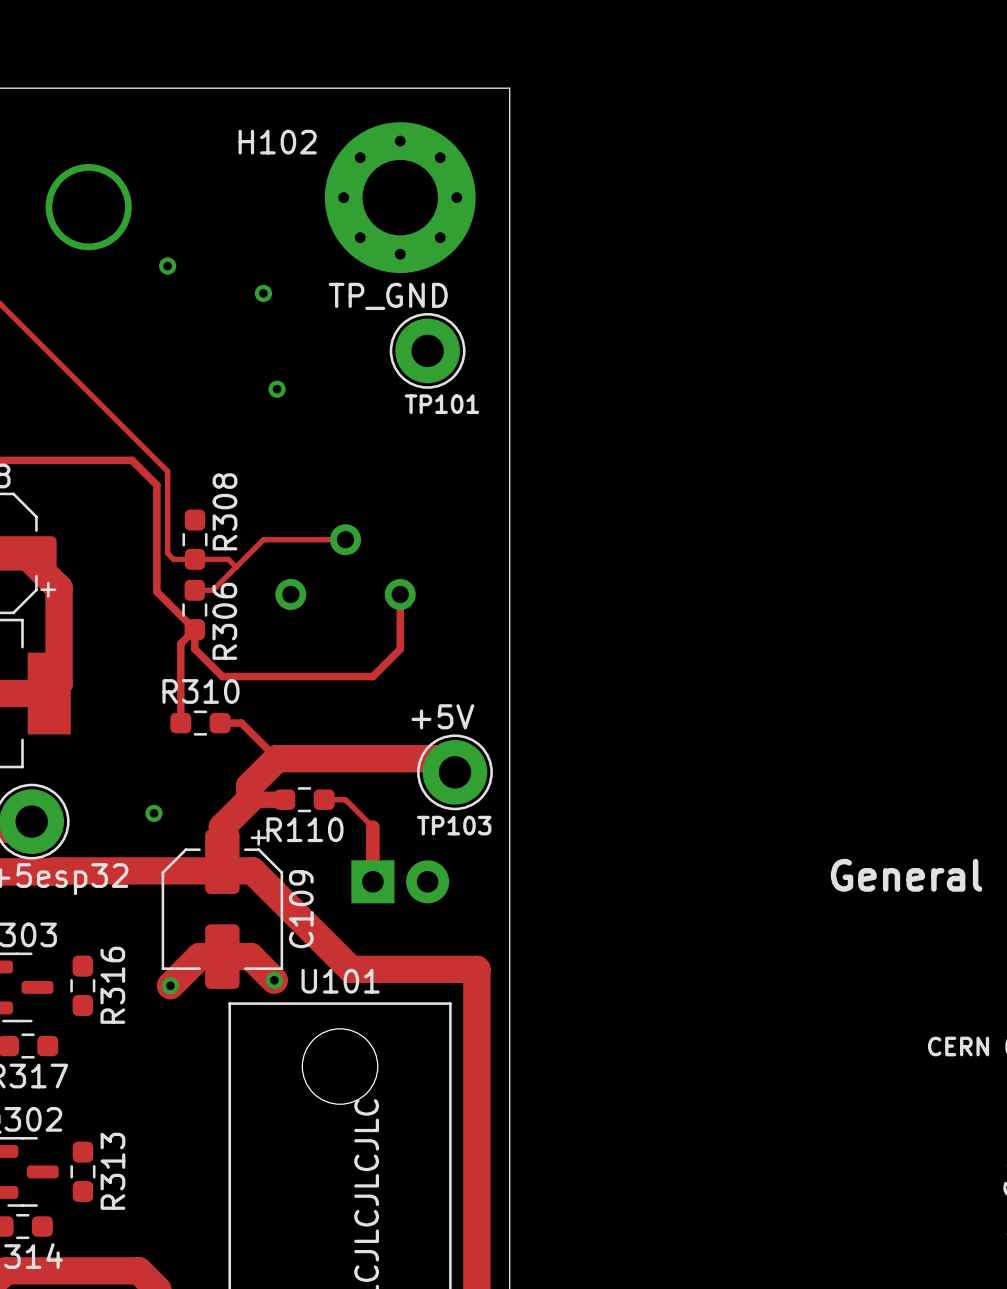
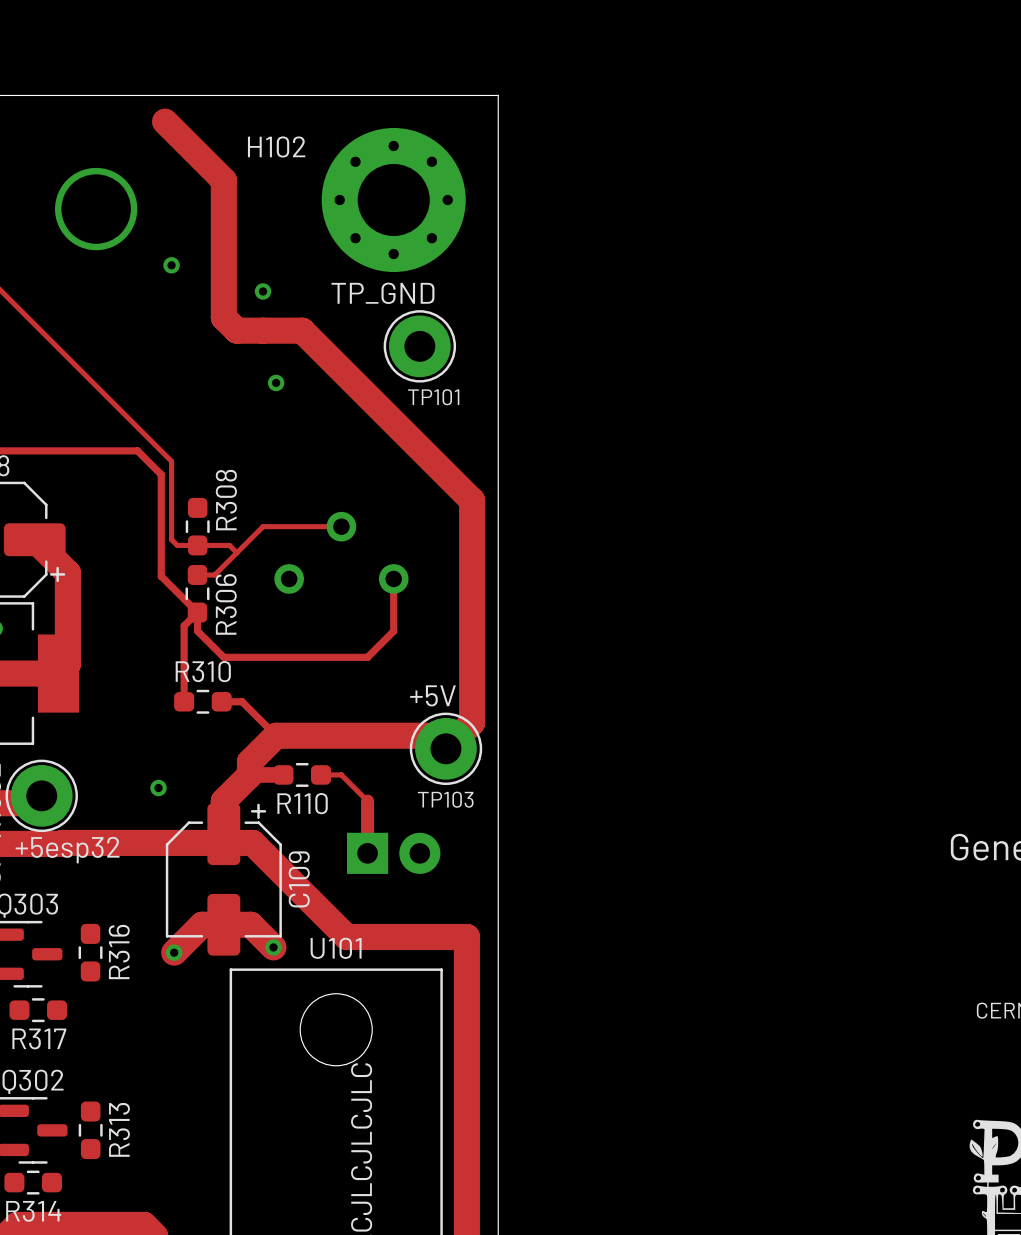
top track: none -> (165, 121) (223, 180) (223, 317) (236, 330)
top track: none -> (236, 330) (302, 330) (472, 500) (472, 722) (445, 748)

